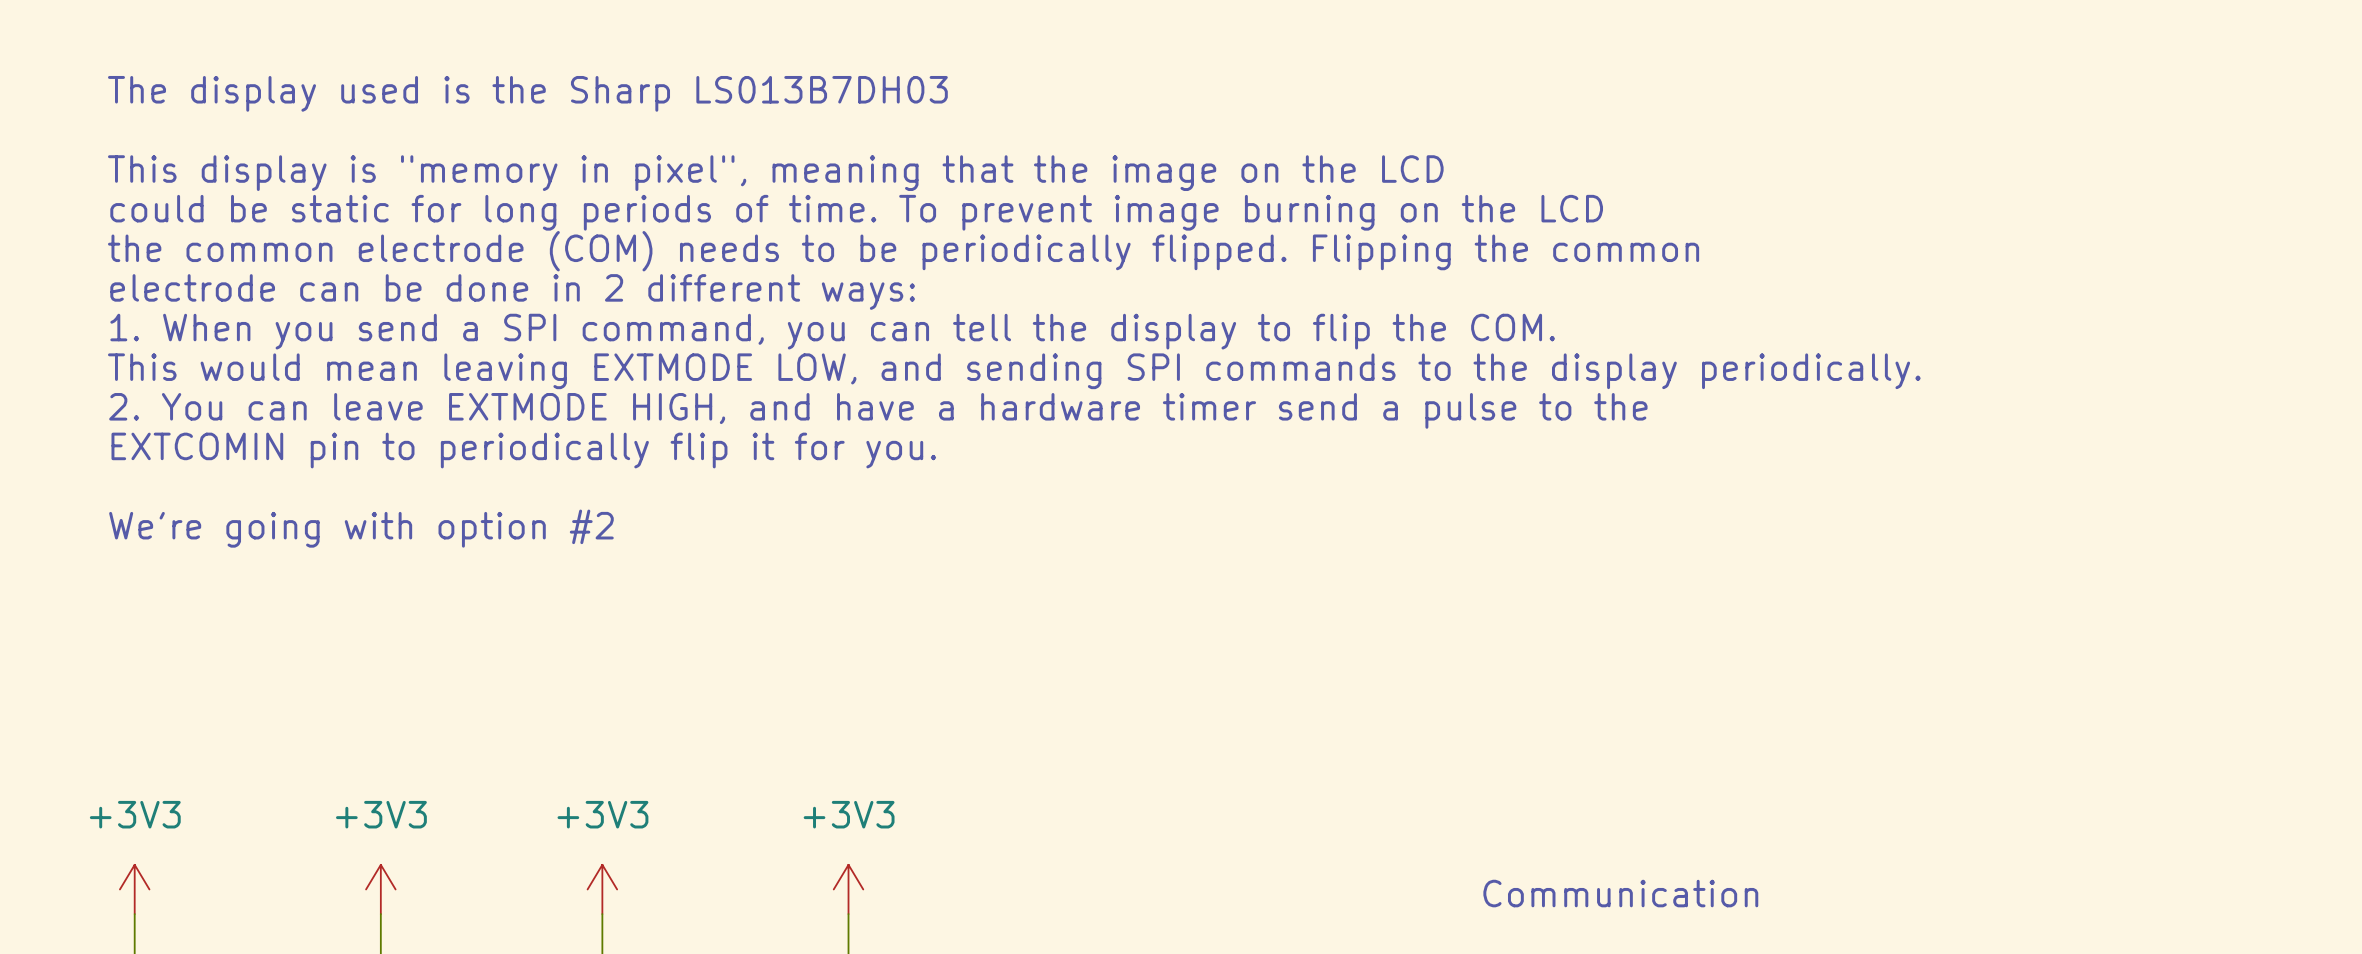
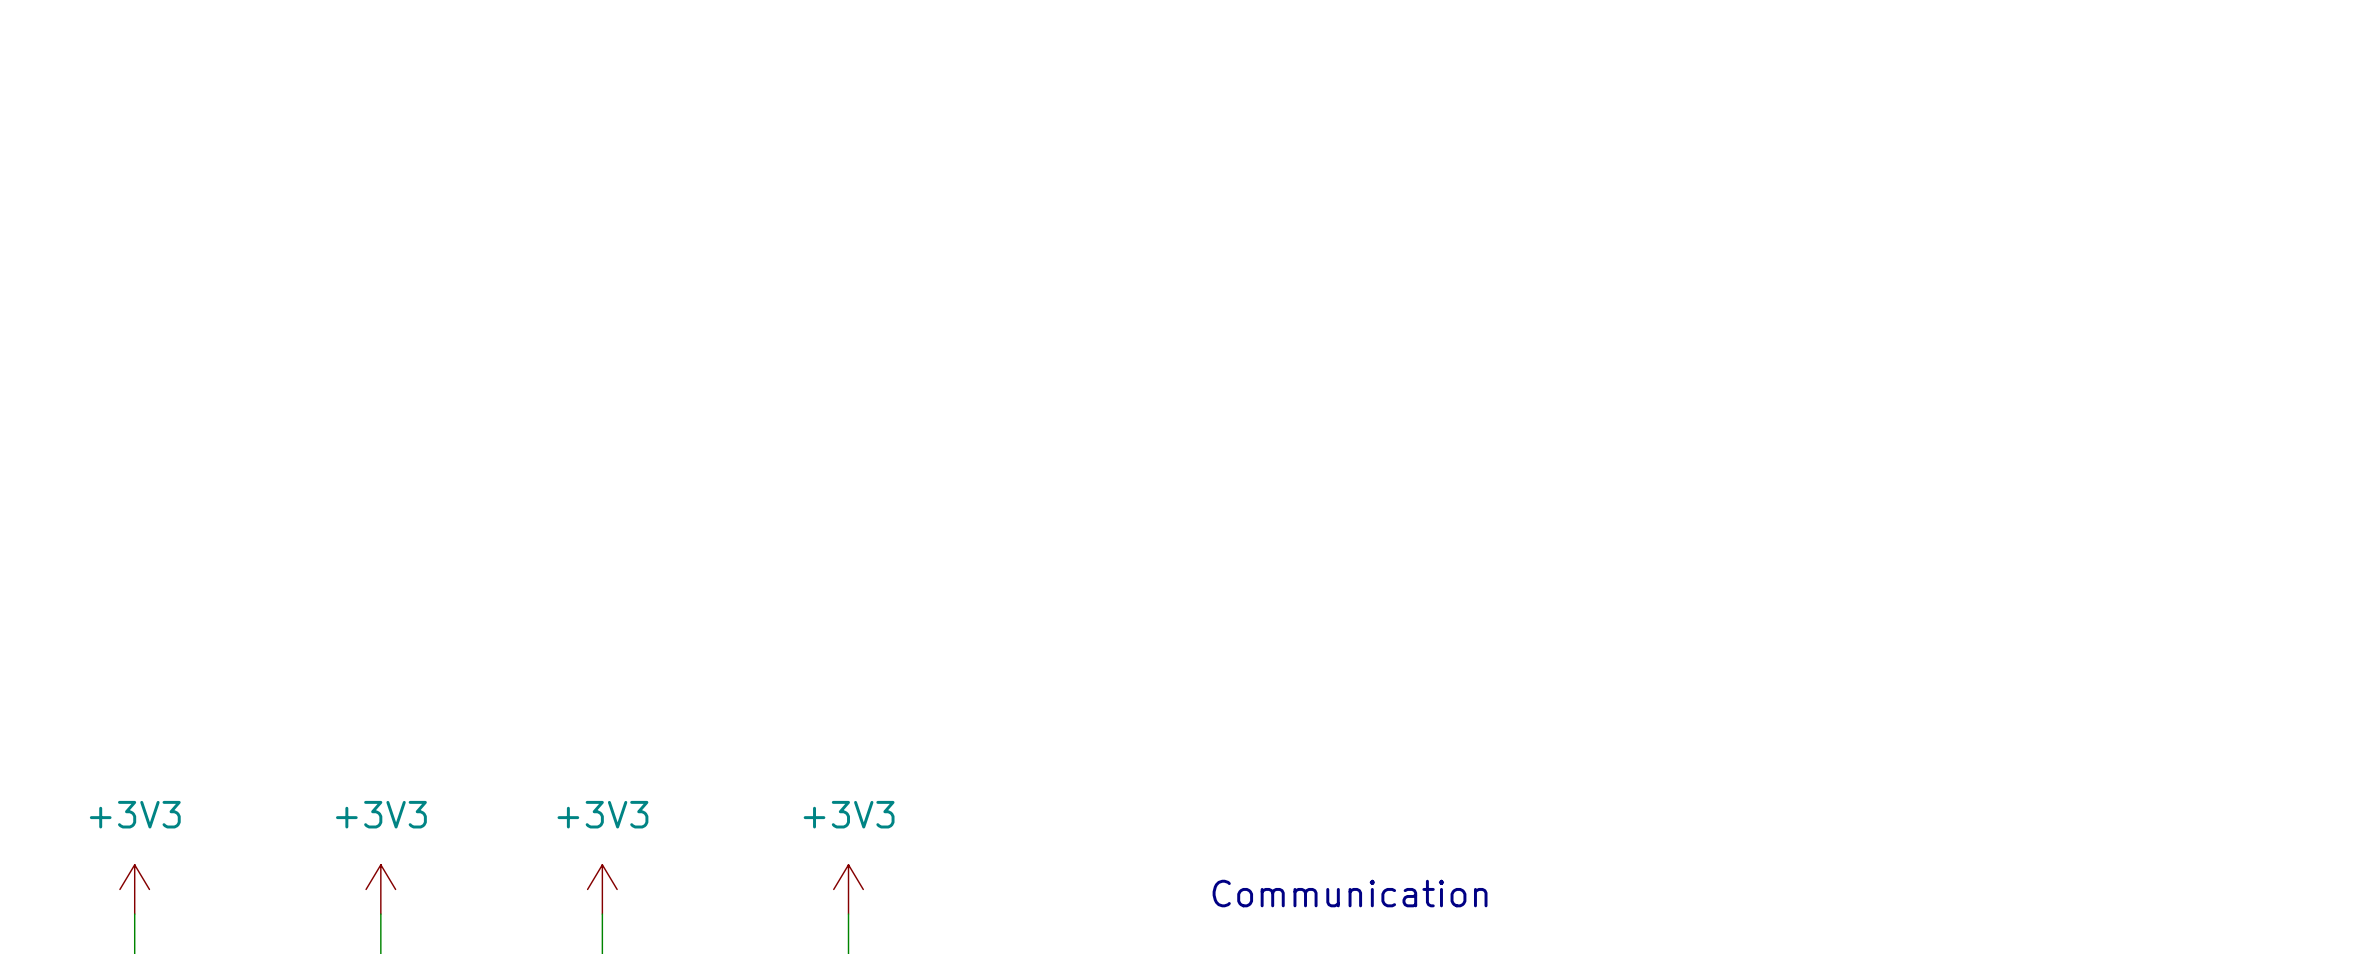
text: The display used is the Sharp LS013B7DH03 (527, 93) -> none
text: This display is "memory in pixel", meaning that the image on the LCD (775, 173) -> none
text: could be static for long periods of time. To prevent image burning on the LCD (856, 212) -> none
text: the common electrode (COM) needs to be periodically flipped. Flipping the common (903, 251) -> none
text: electrode can be done in 2 different ways: (512, 292) -> none
text: 1. When you send a SPI command, you can tell the display to flip the COM. (832, 331) -> none
text: This would mean leaving EXTMODE LOW, and sending SPI commands to the display periodically. (1014, 371) -> none
text: 2. You can leave EXTMODE HIGH, and have a hardware timer send a pulse to the (878, 410) -> none
text: EXTCOMIN pin to periodically flip it for you. (523, 450) -> none
text: We're going with option #2 (361, 528) -> none
text position: Communication (1620, 893) -> Communication (1350, 893)

